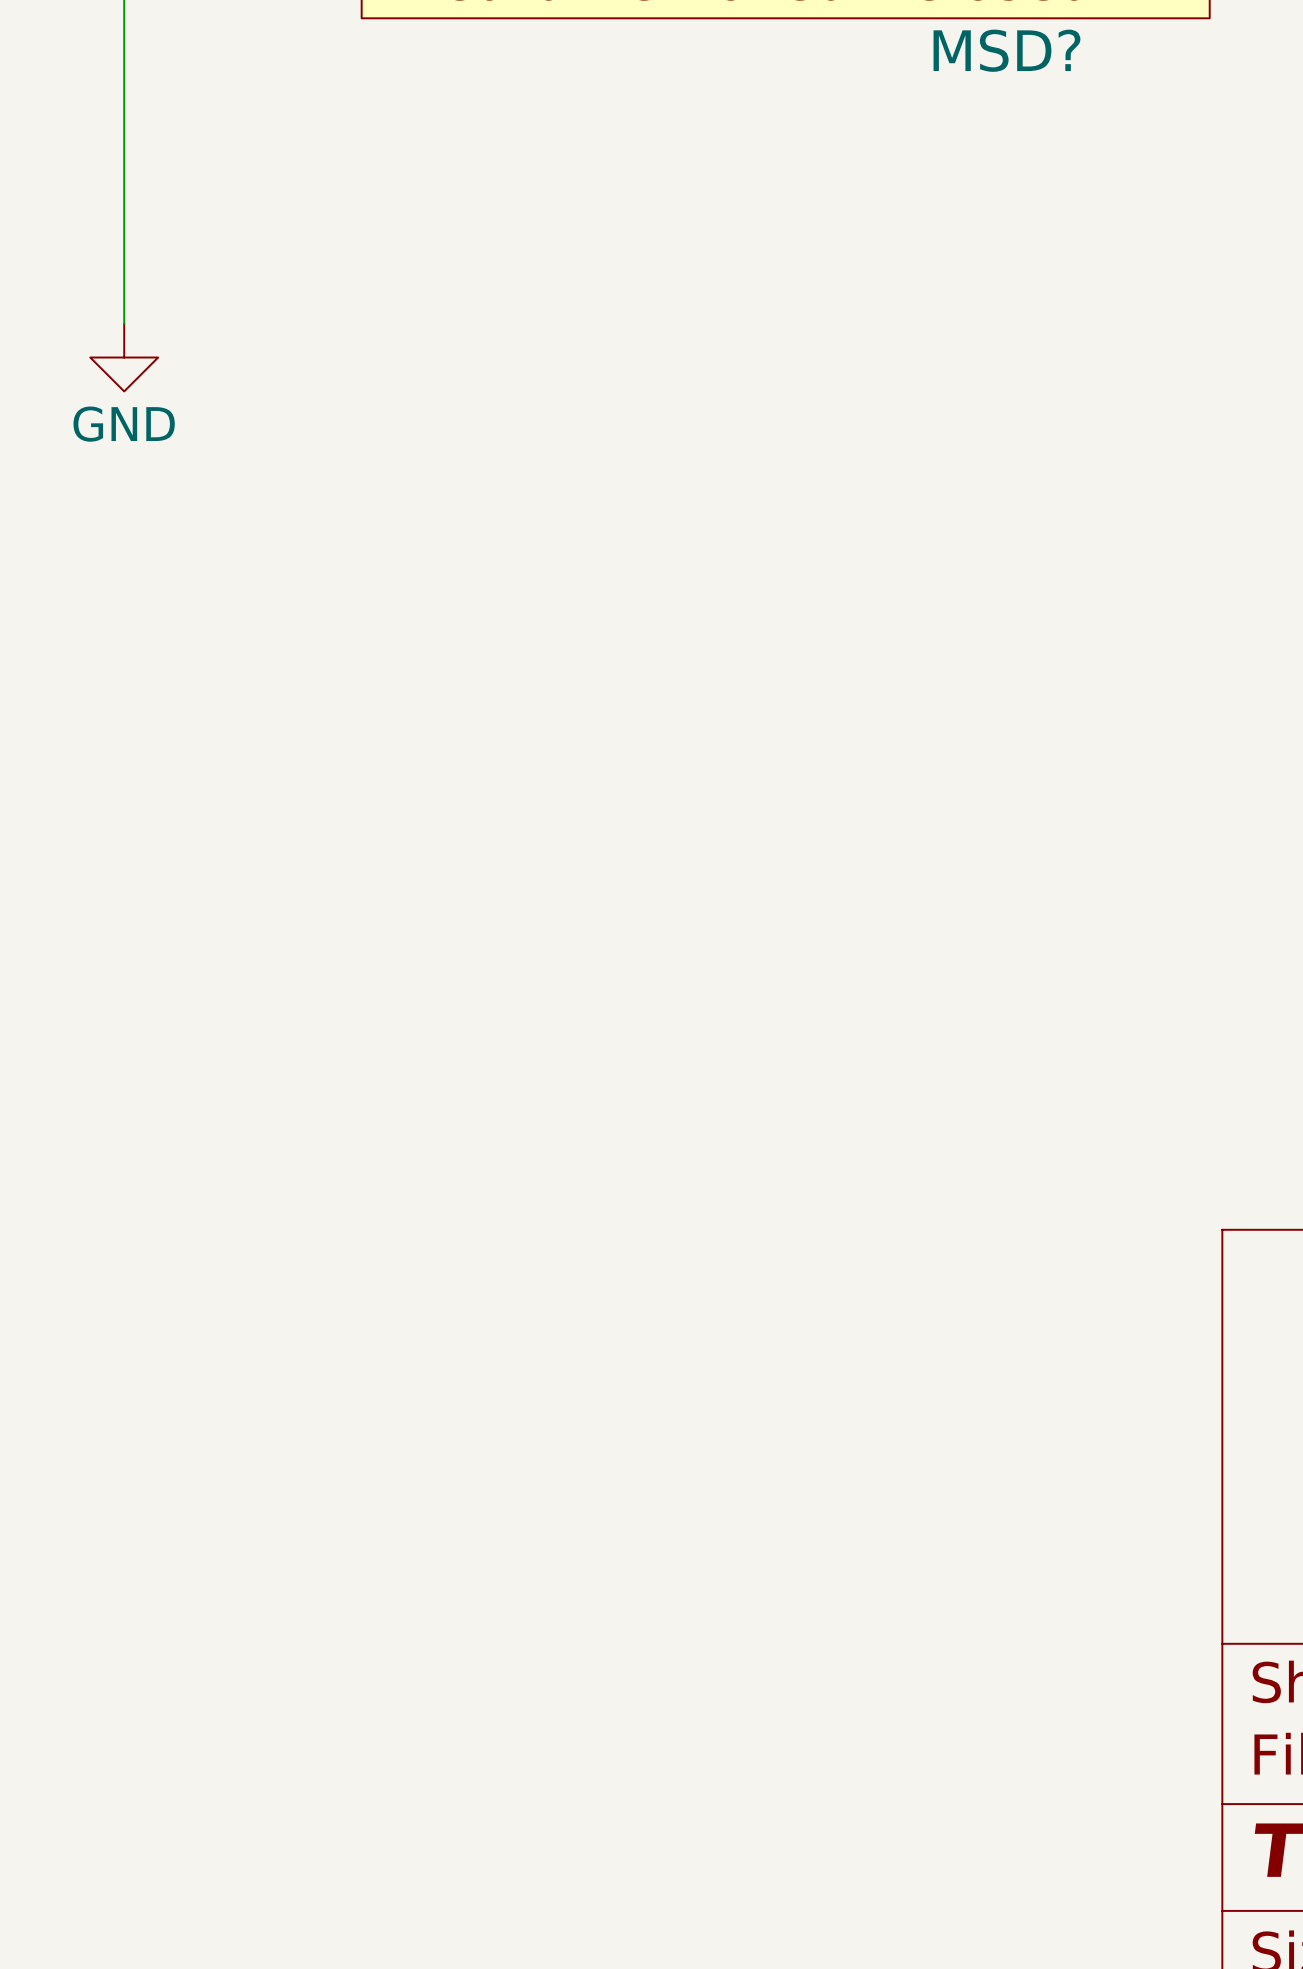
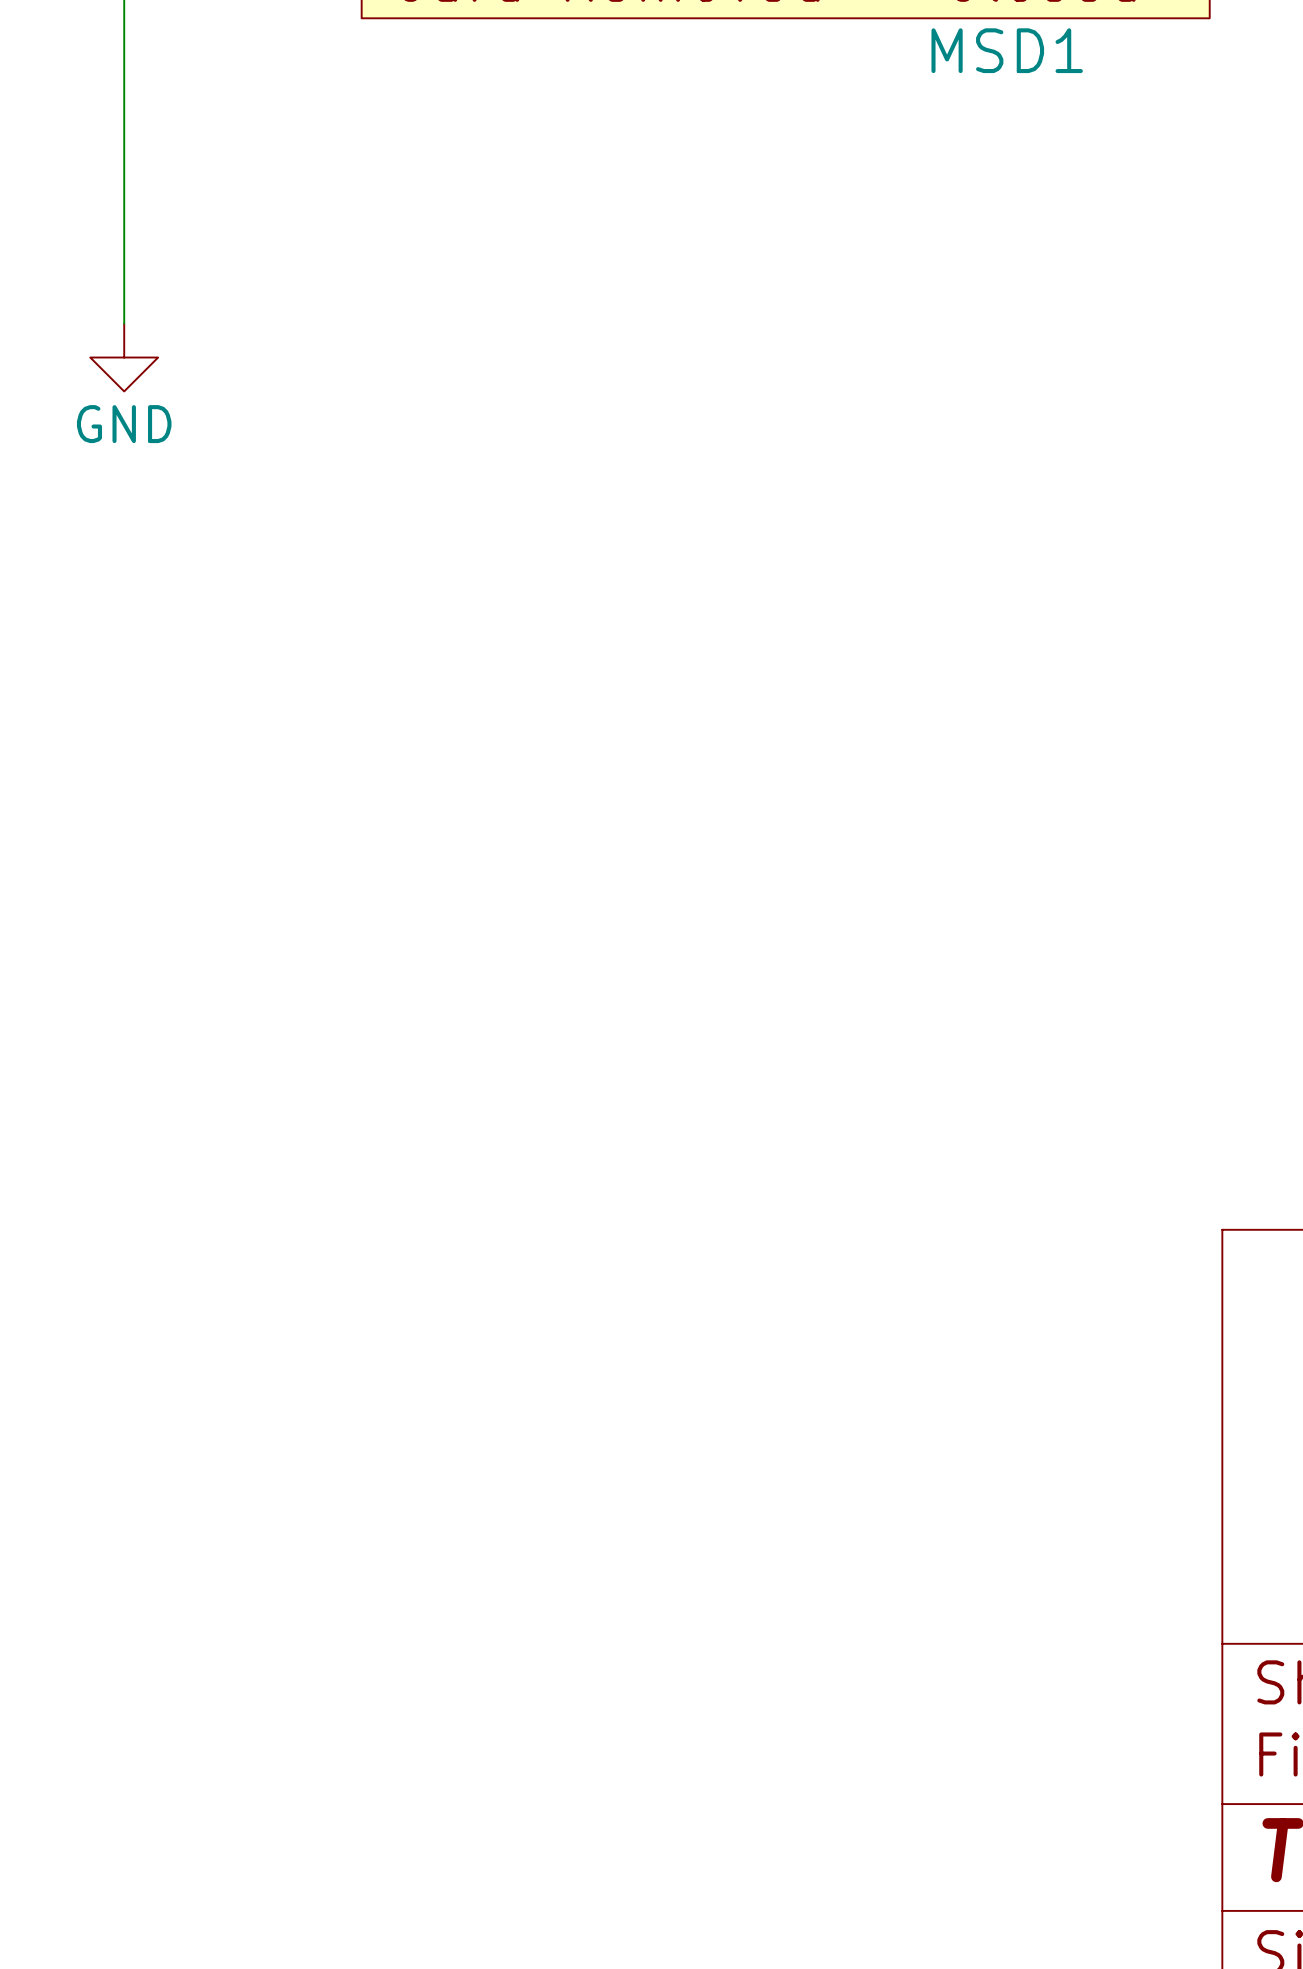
MSD? name: MSD? (1006, 50) -> MSD1 (1007, 50)

